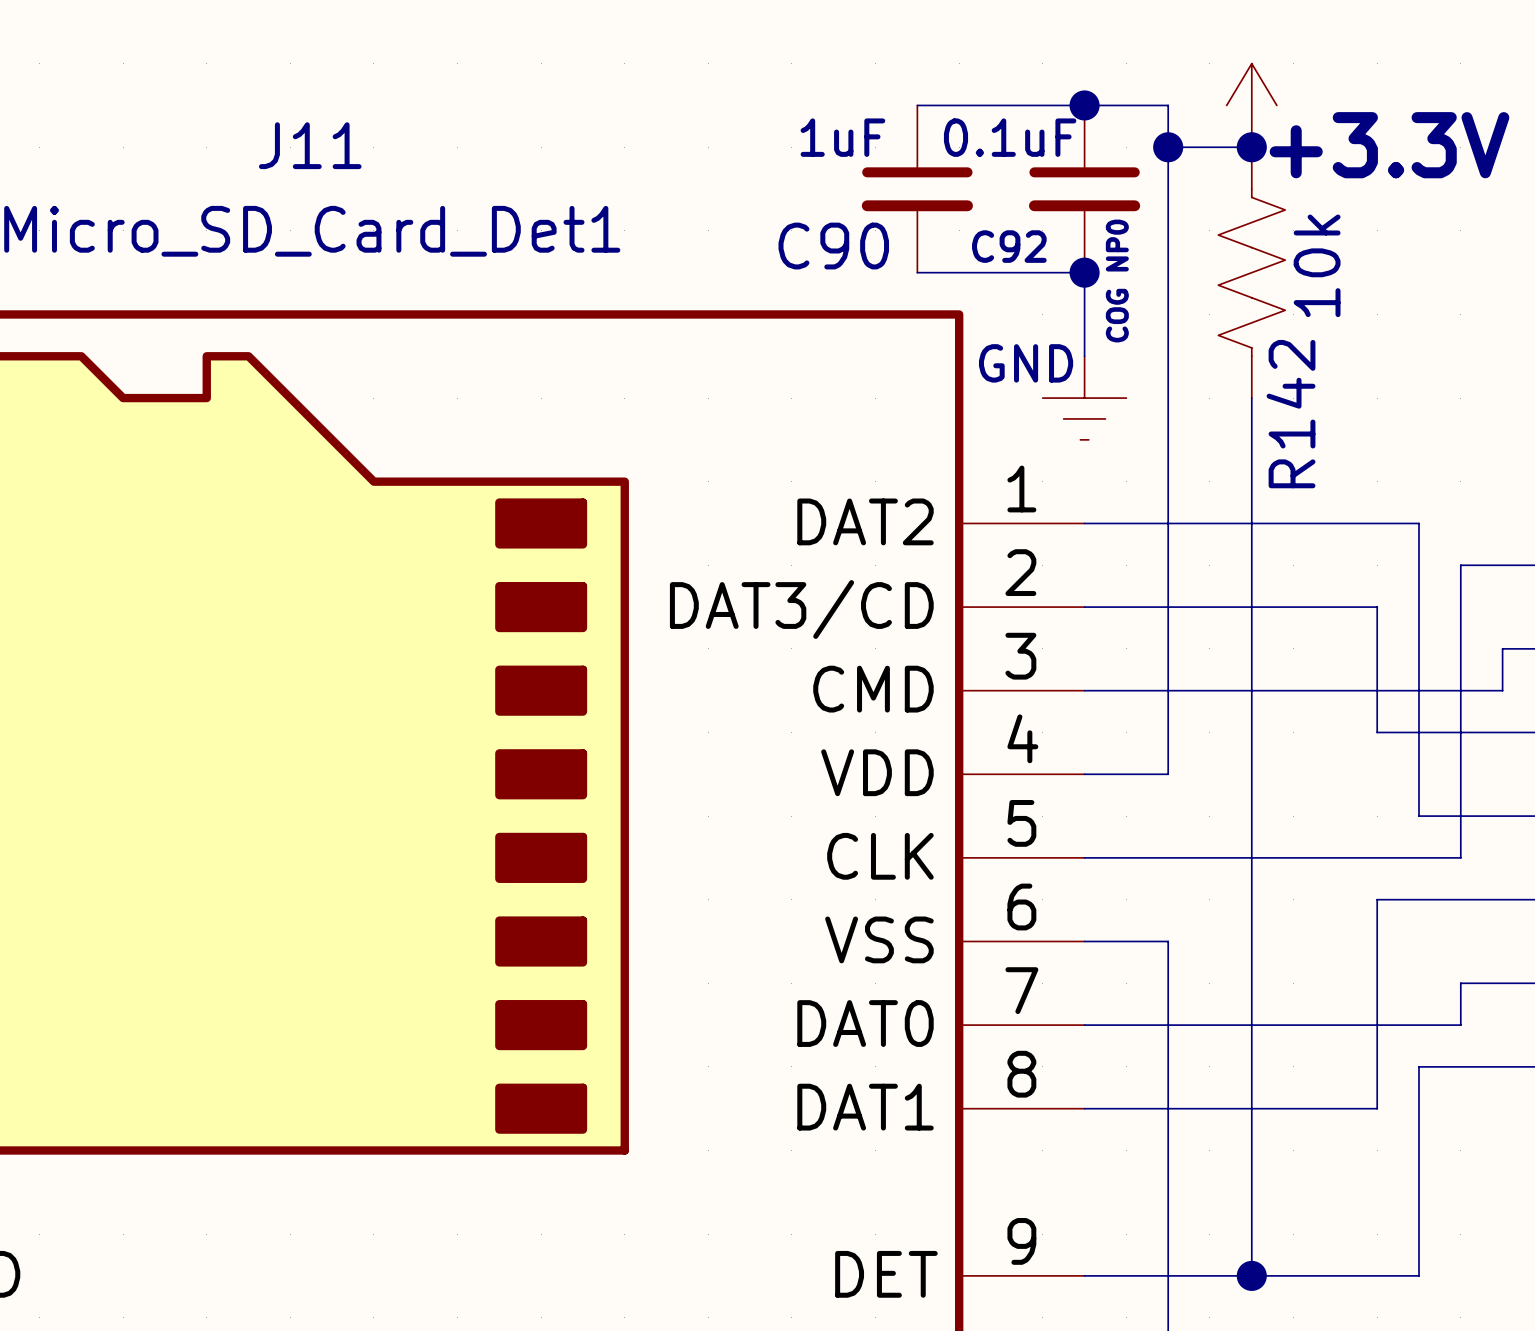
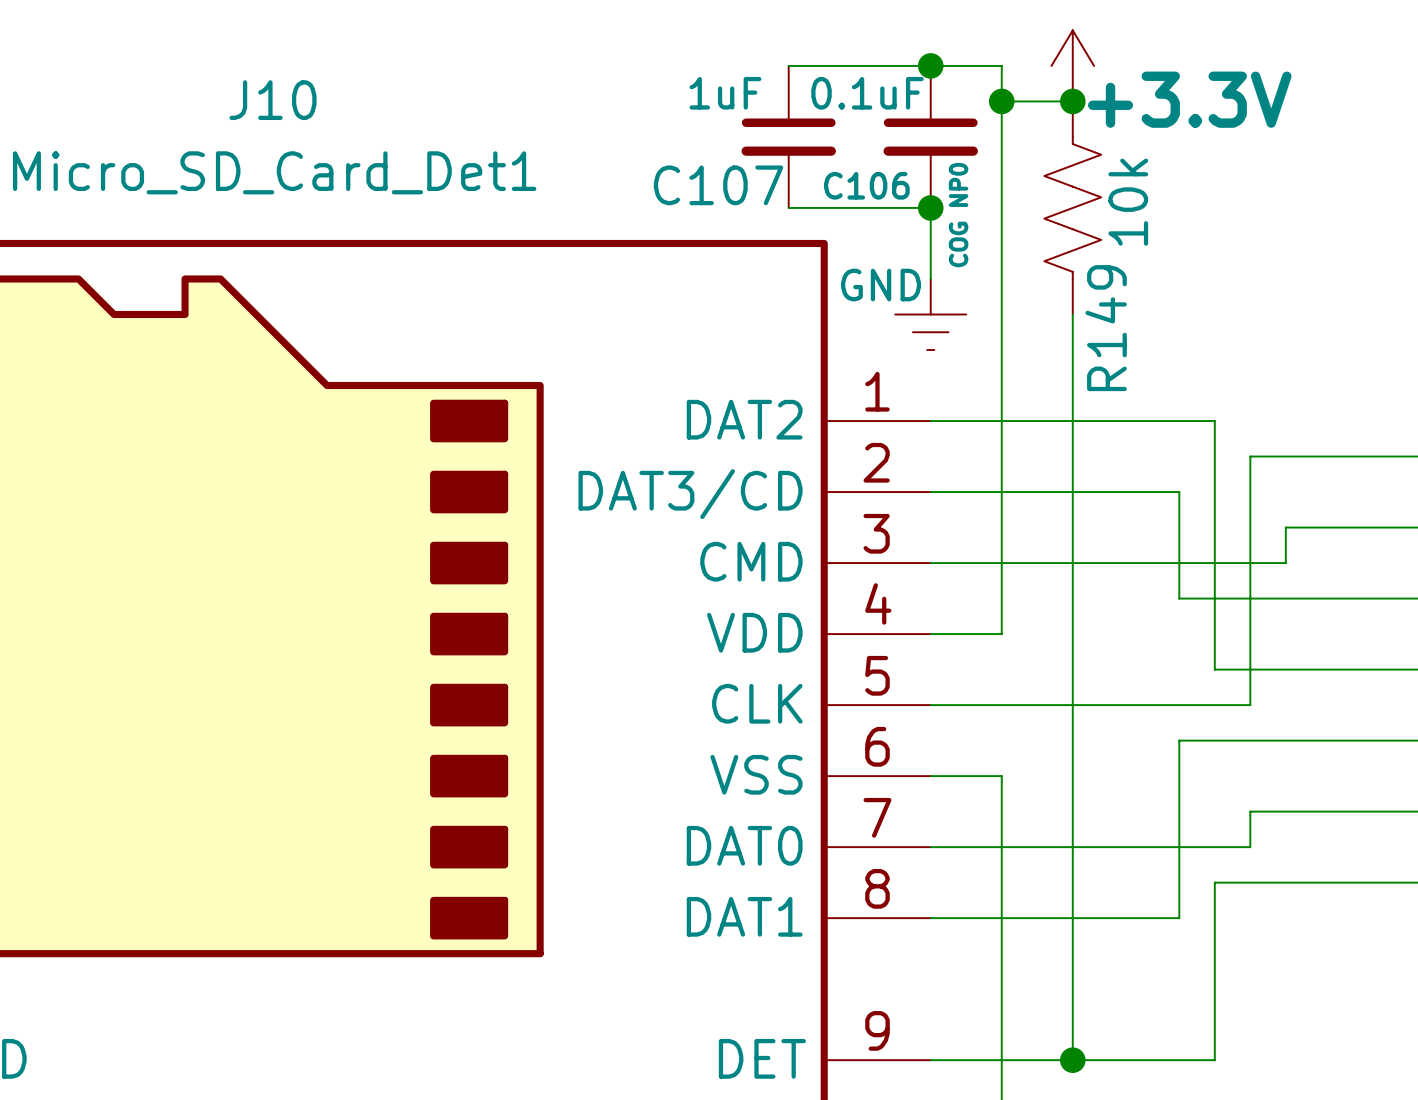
J11 name: J11 (310, 145) -> J10 (272, 100)
C90 name: C90 (833, 246) -> C107 (718, 185)
C92 name: C92 (1009, 246) -> C106 (866, 185)
R142 name: R142 (1291, 414) -> R149 (1106, 328)

